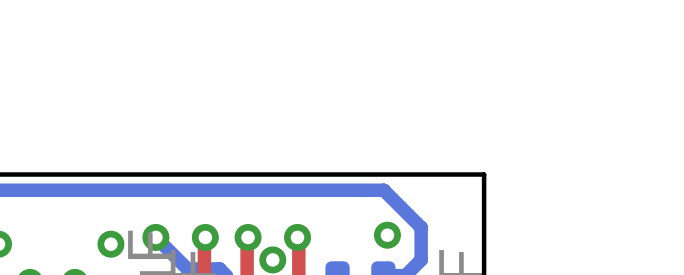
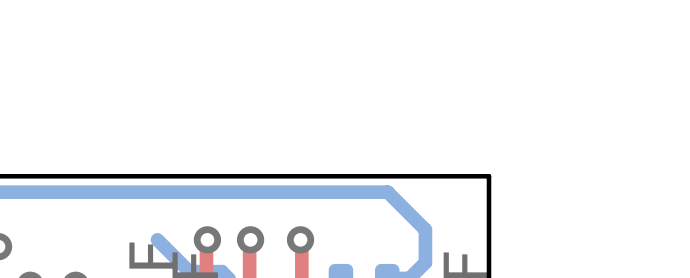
via: (387, 235) -> none
via: (155, 237) -> none
via: (110, 244) -> none
via: (272, 259) -> none

